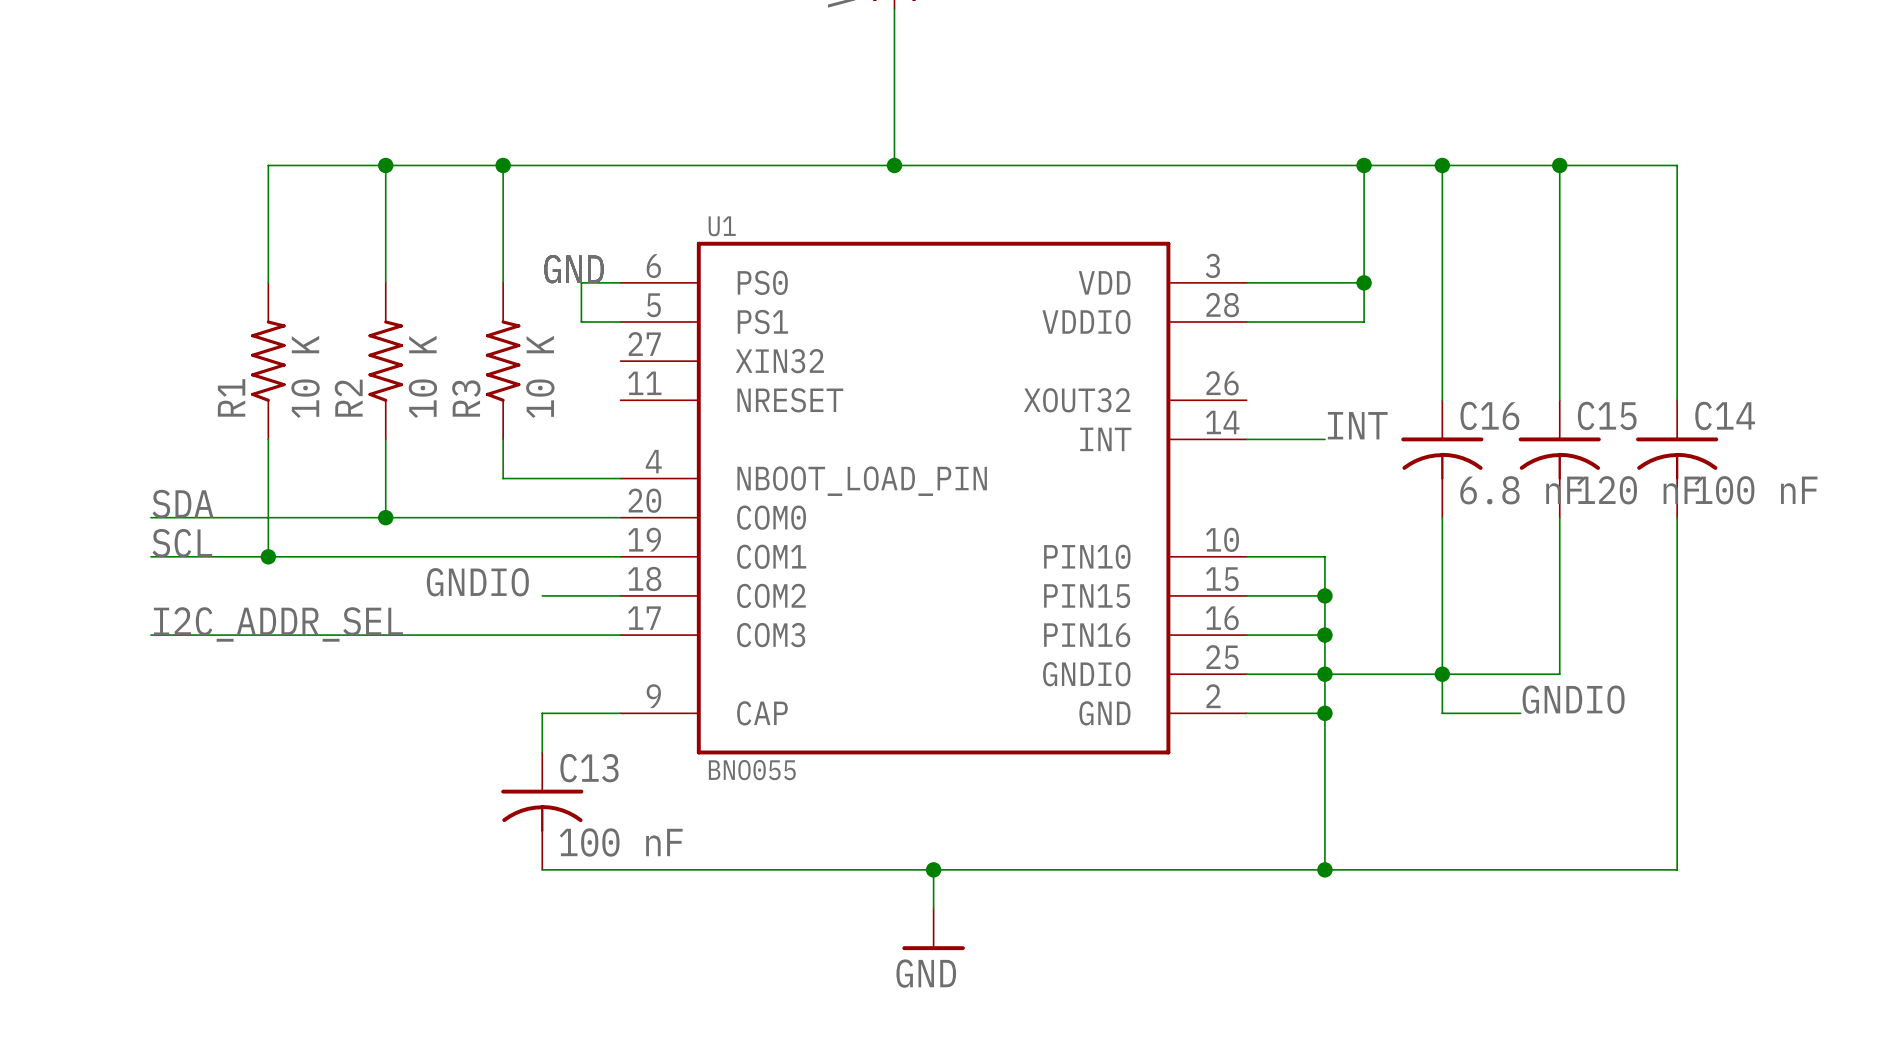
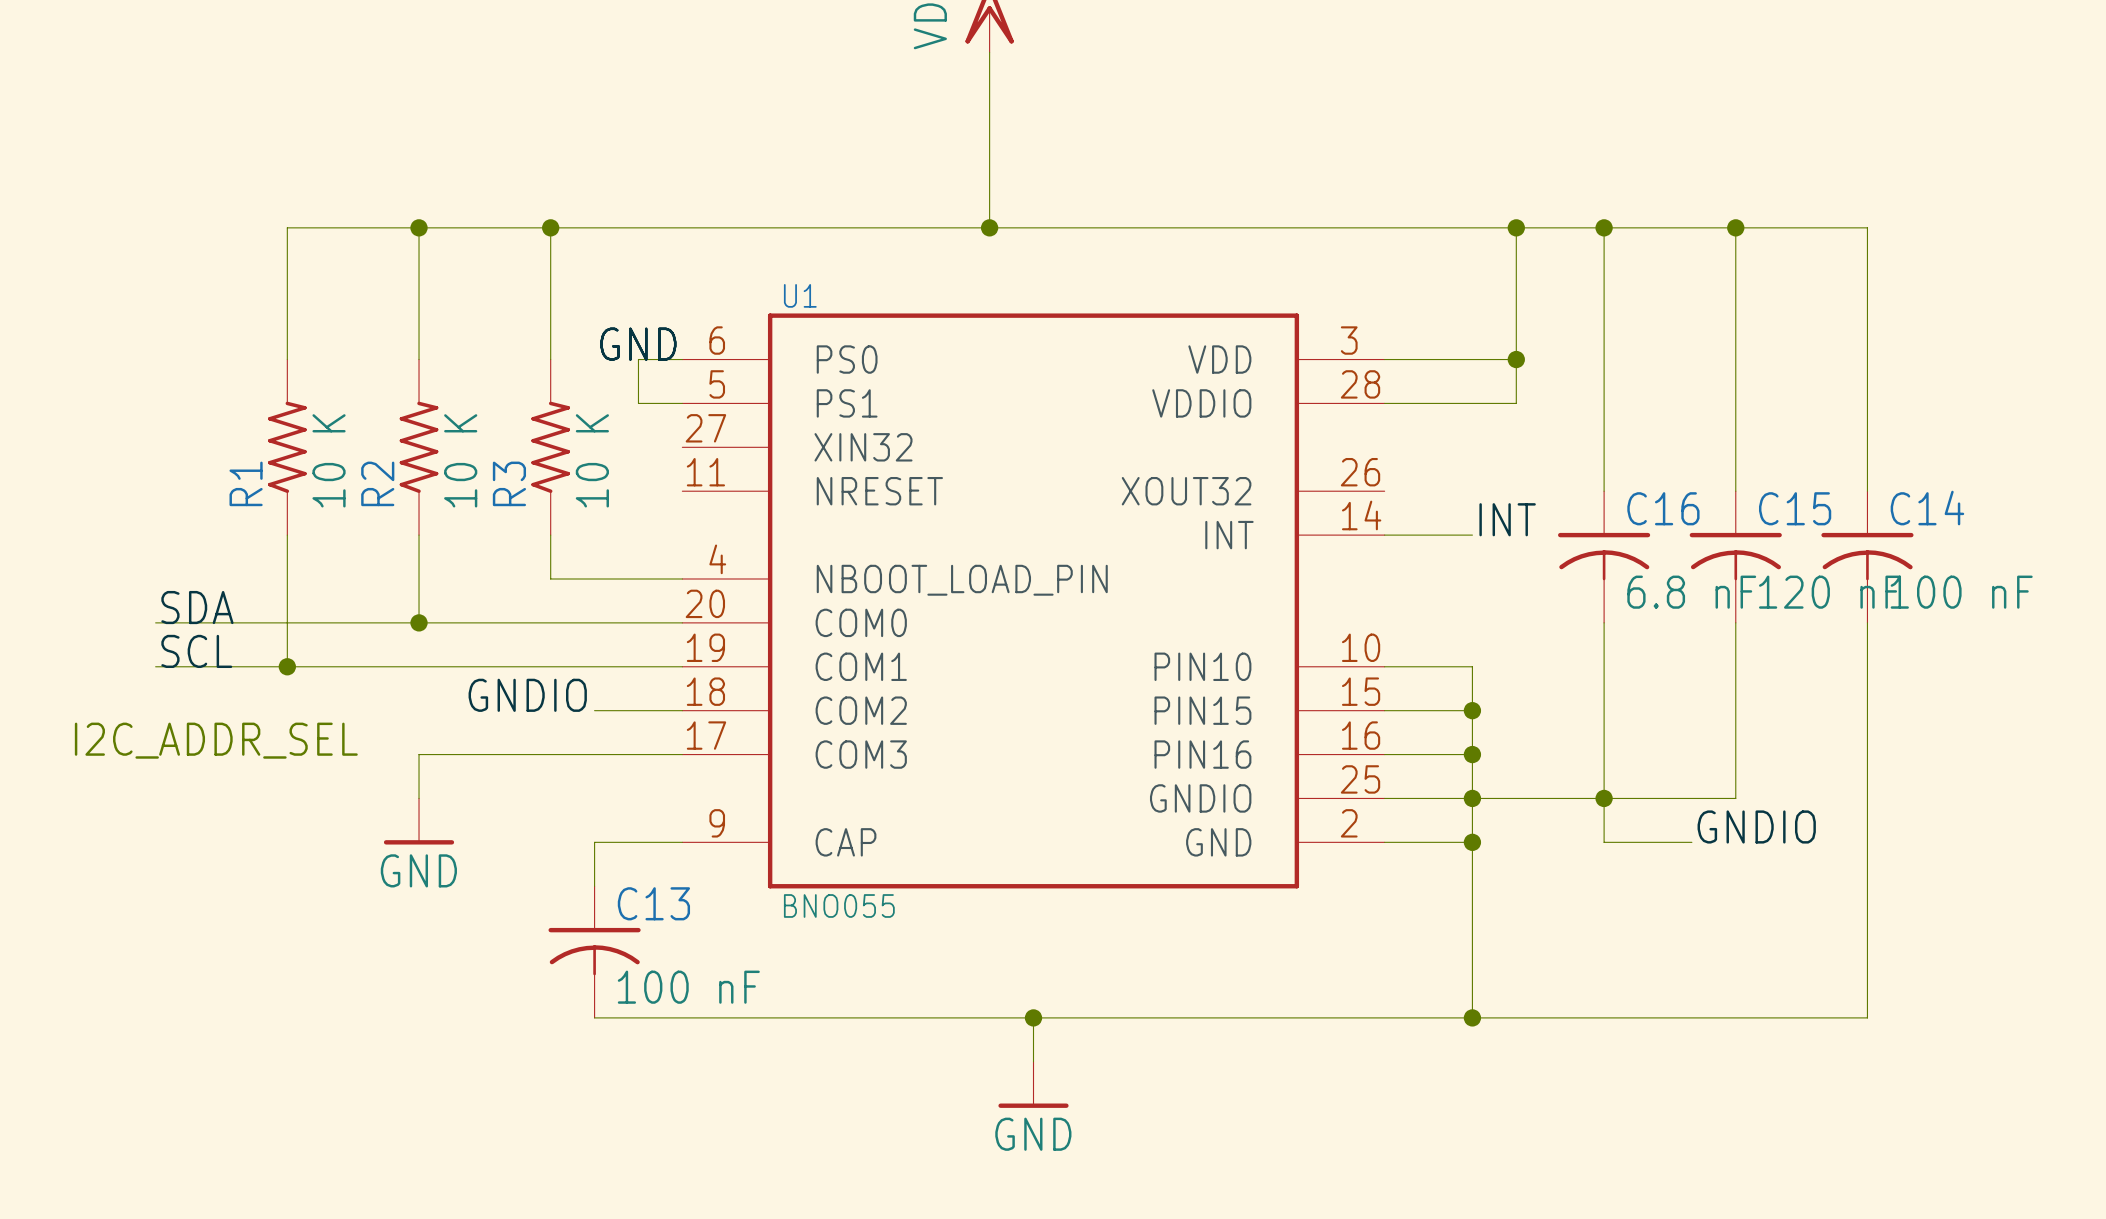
text: none -> I2C_ADDR_SEL (216, 740)
label: I2C_ADDR_SEL (278, 624) -> none
wire: (150, 635) (385, 635) -> (419, 798) (419, 754)
power symbol: none -> GND (419, 821)

